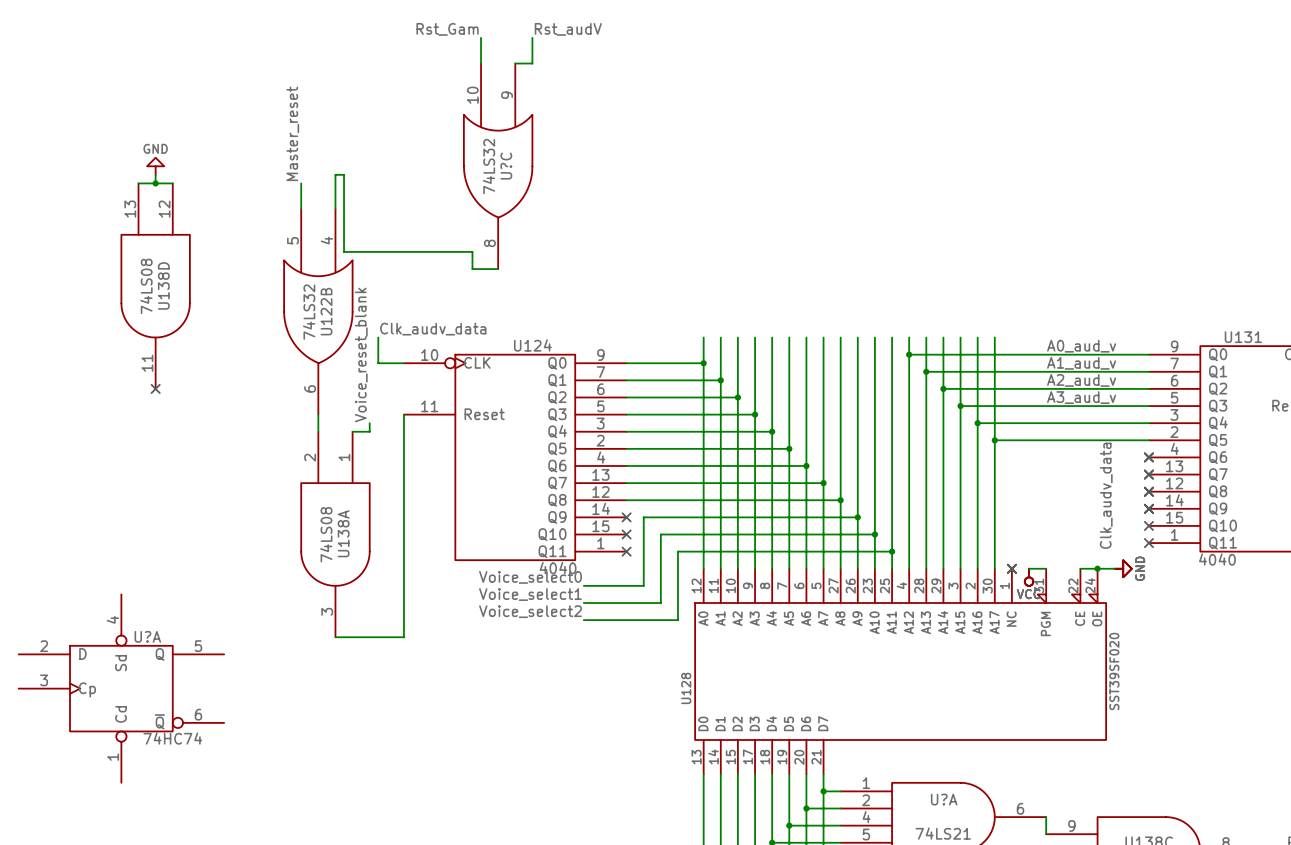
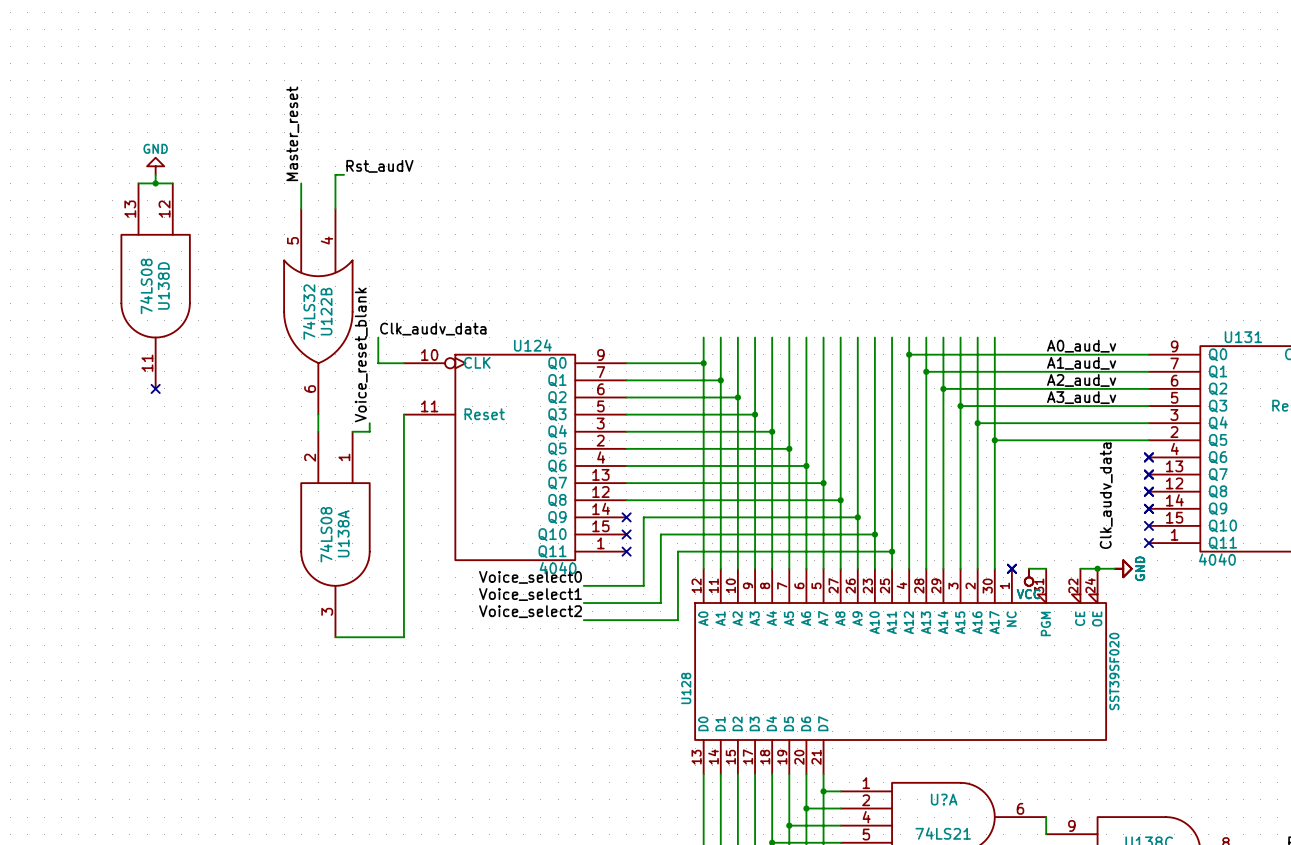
label: Rst_Gam (447, 29) -> none
label: Rst_audV (568, 29) -> none
wire: (481, 37) (481, 63) -> none
wire: (532, 37) (532, 63) (515, 63) -> none
label: none -> Rst_audV (379, 166)
U?C: 74LS32 (498, 166) -> none
wire: (344, 174) (344, 251) (472, 251) (472, 269) (498, 269) -> none
U?A: 74HC74 (121, 688) -> none

